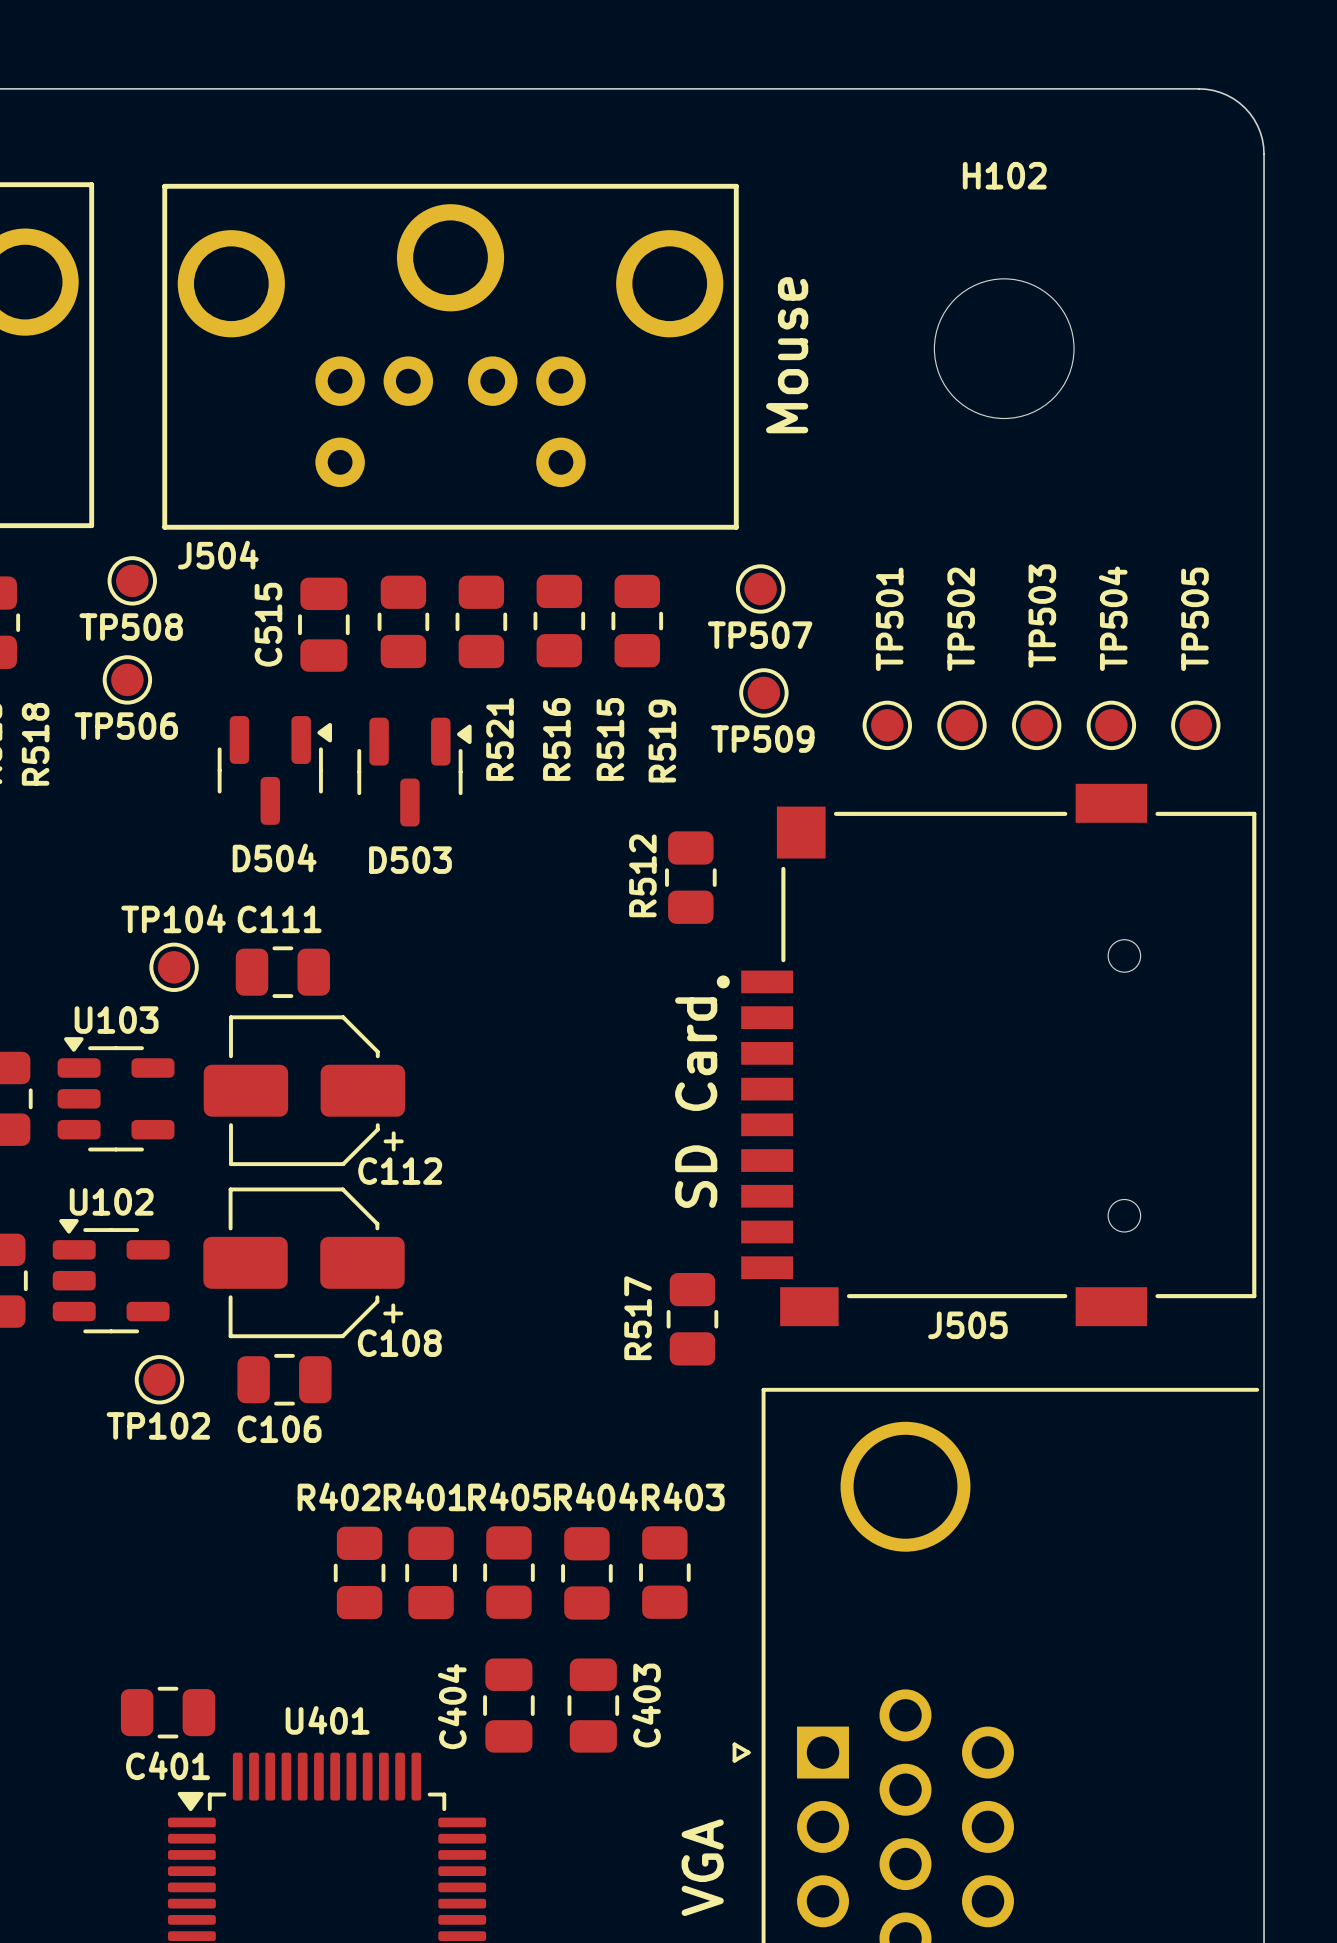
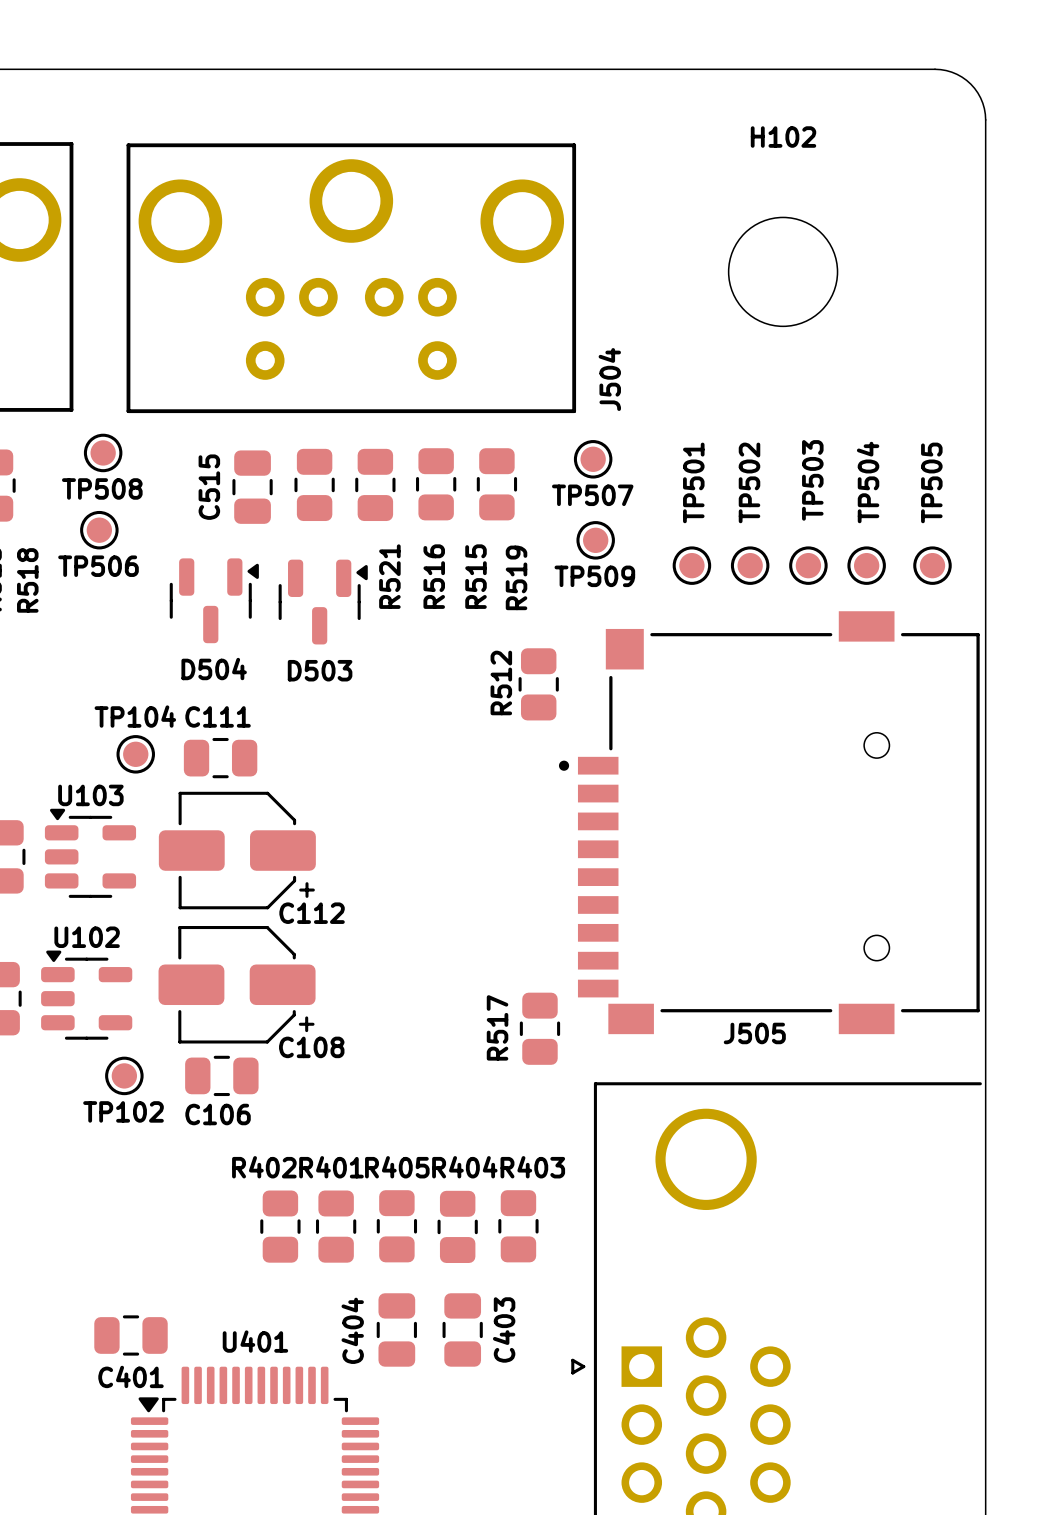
text: Mouse (787, 355) -> none
J504 name rotation: 0° (218, 555) -> 90° counterclockwise (609, 379)
J504 name position: J504 (218, 555) -> J504 (609, 379)
text: SD Card (696, 1102) -> none
text: VGA (702, 1867) -> none

